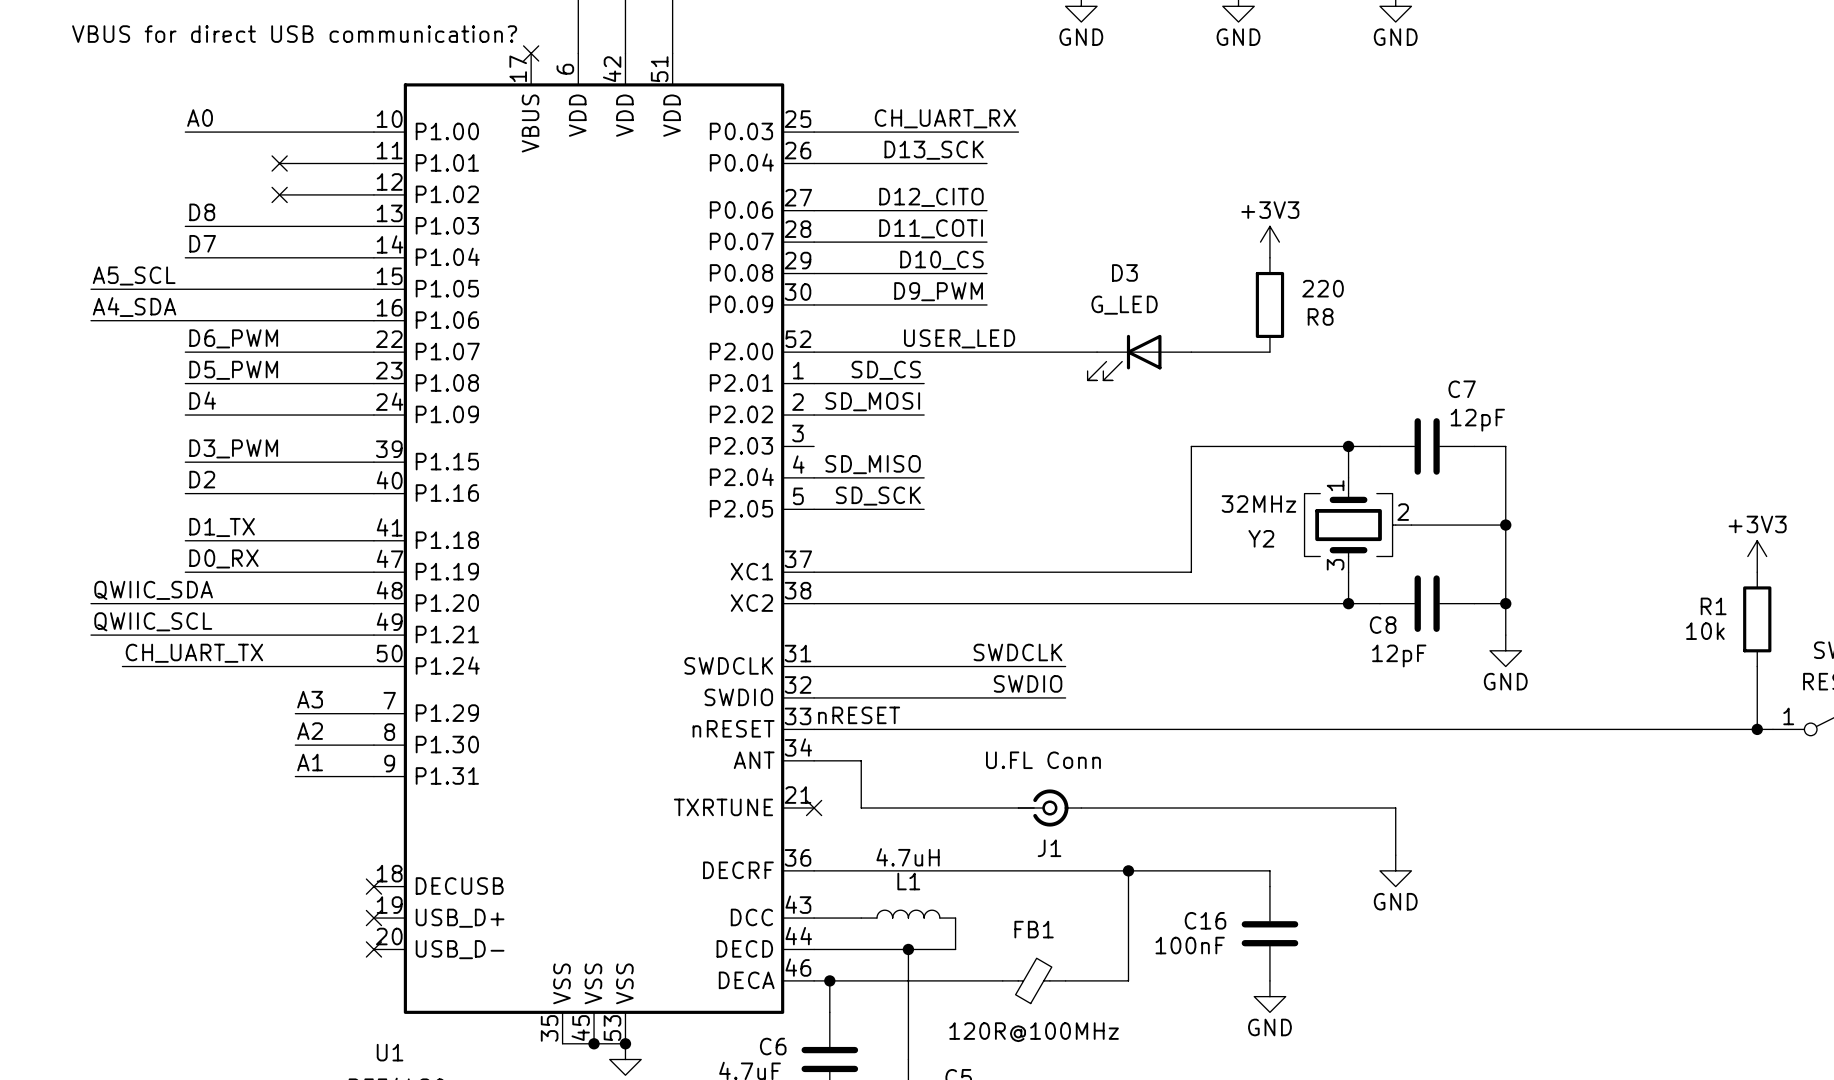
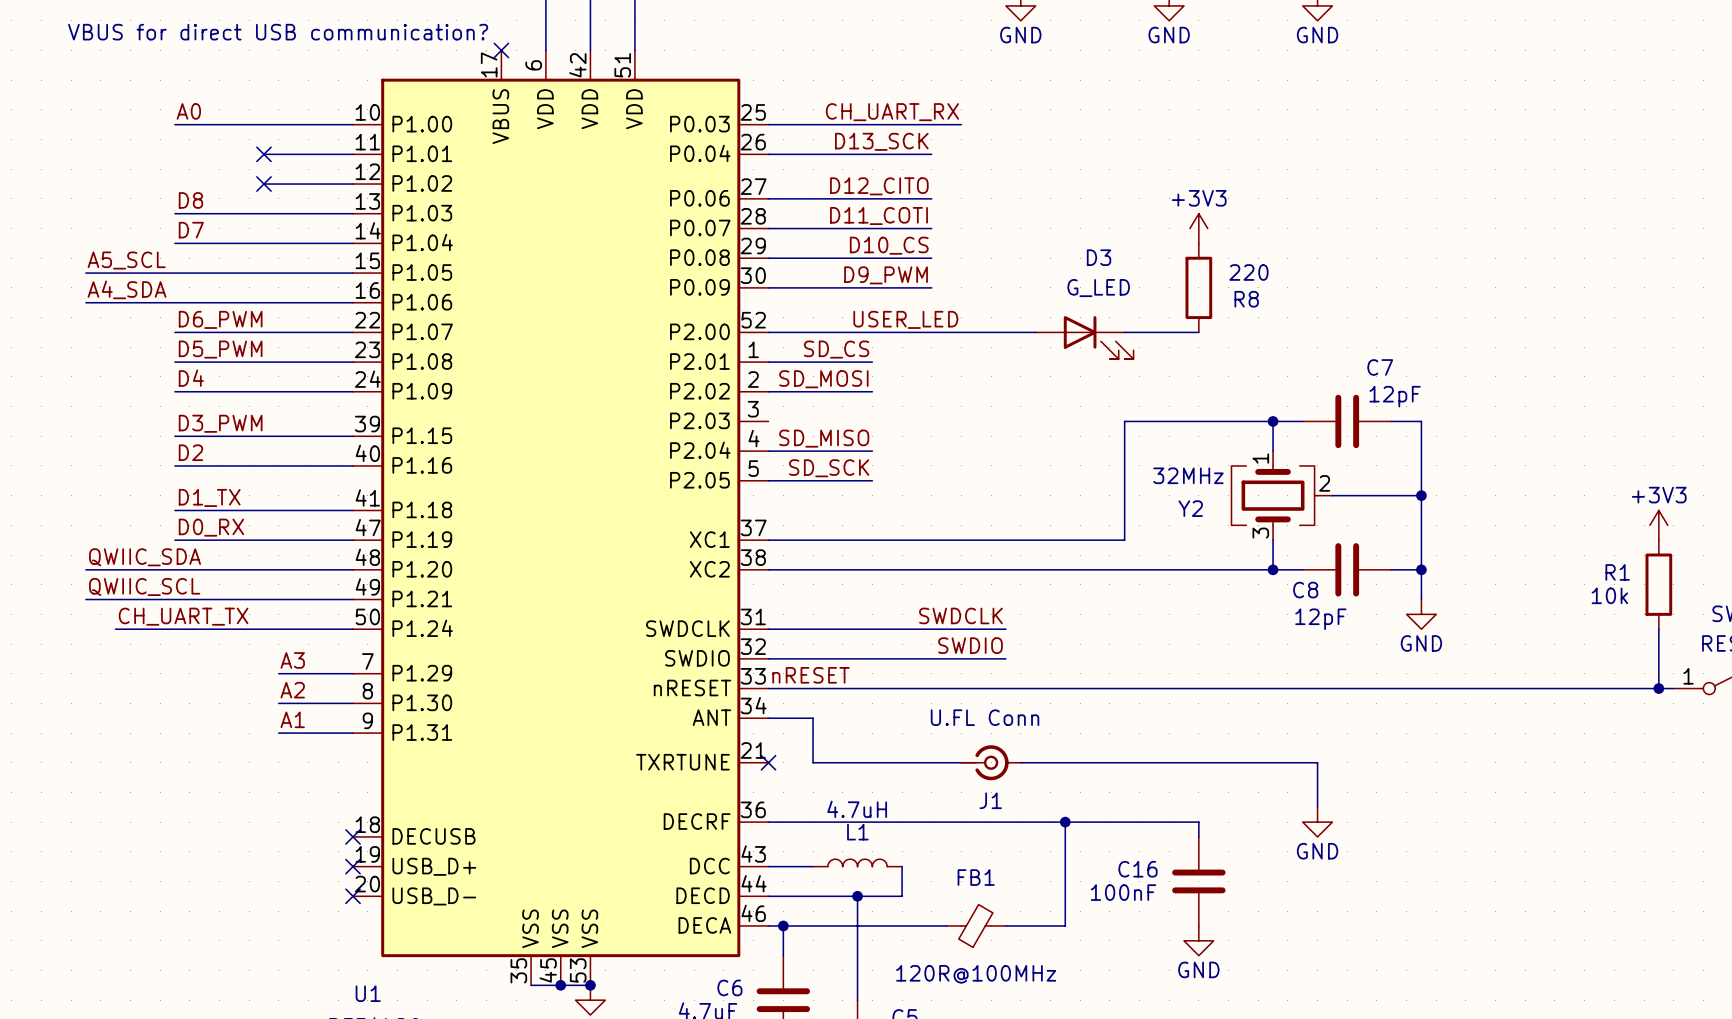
D3 flip: as is (1124, 357) -> left-right (1098, 337)

